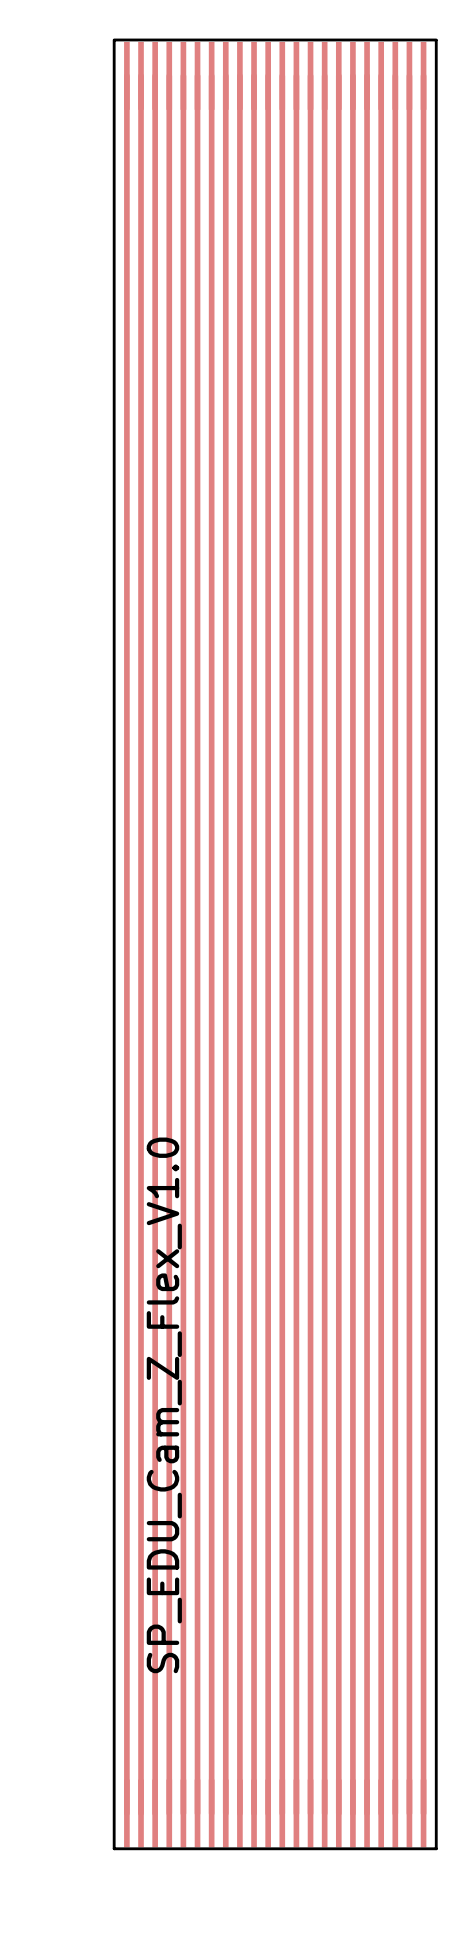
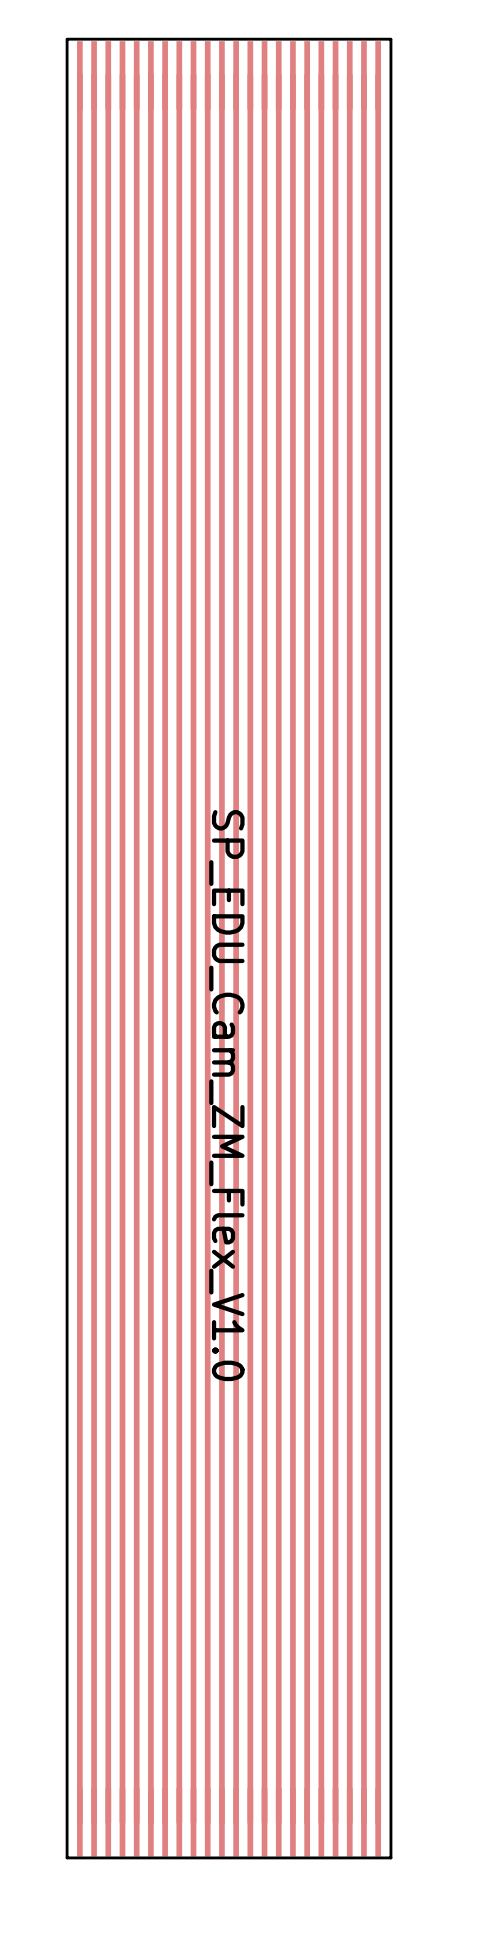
text: none -> SP_EDU_Cam_ZM_Flex_V1.0 (226, 1095)
text: SP_EDU_Cam_Z_Flex_V1.0 (164, 1405) -> none

